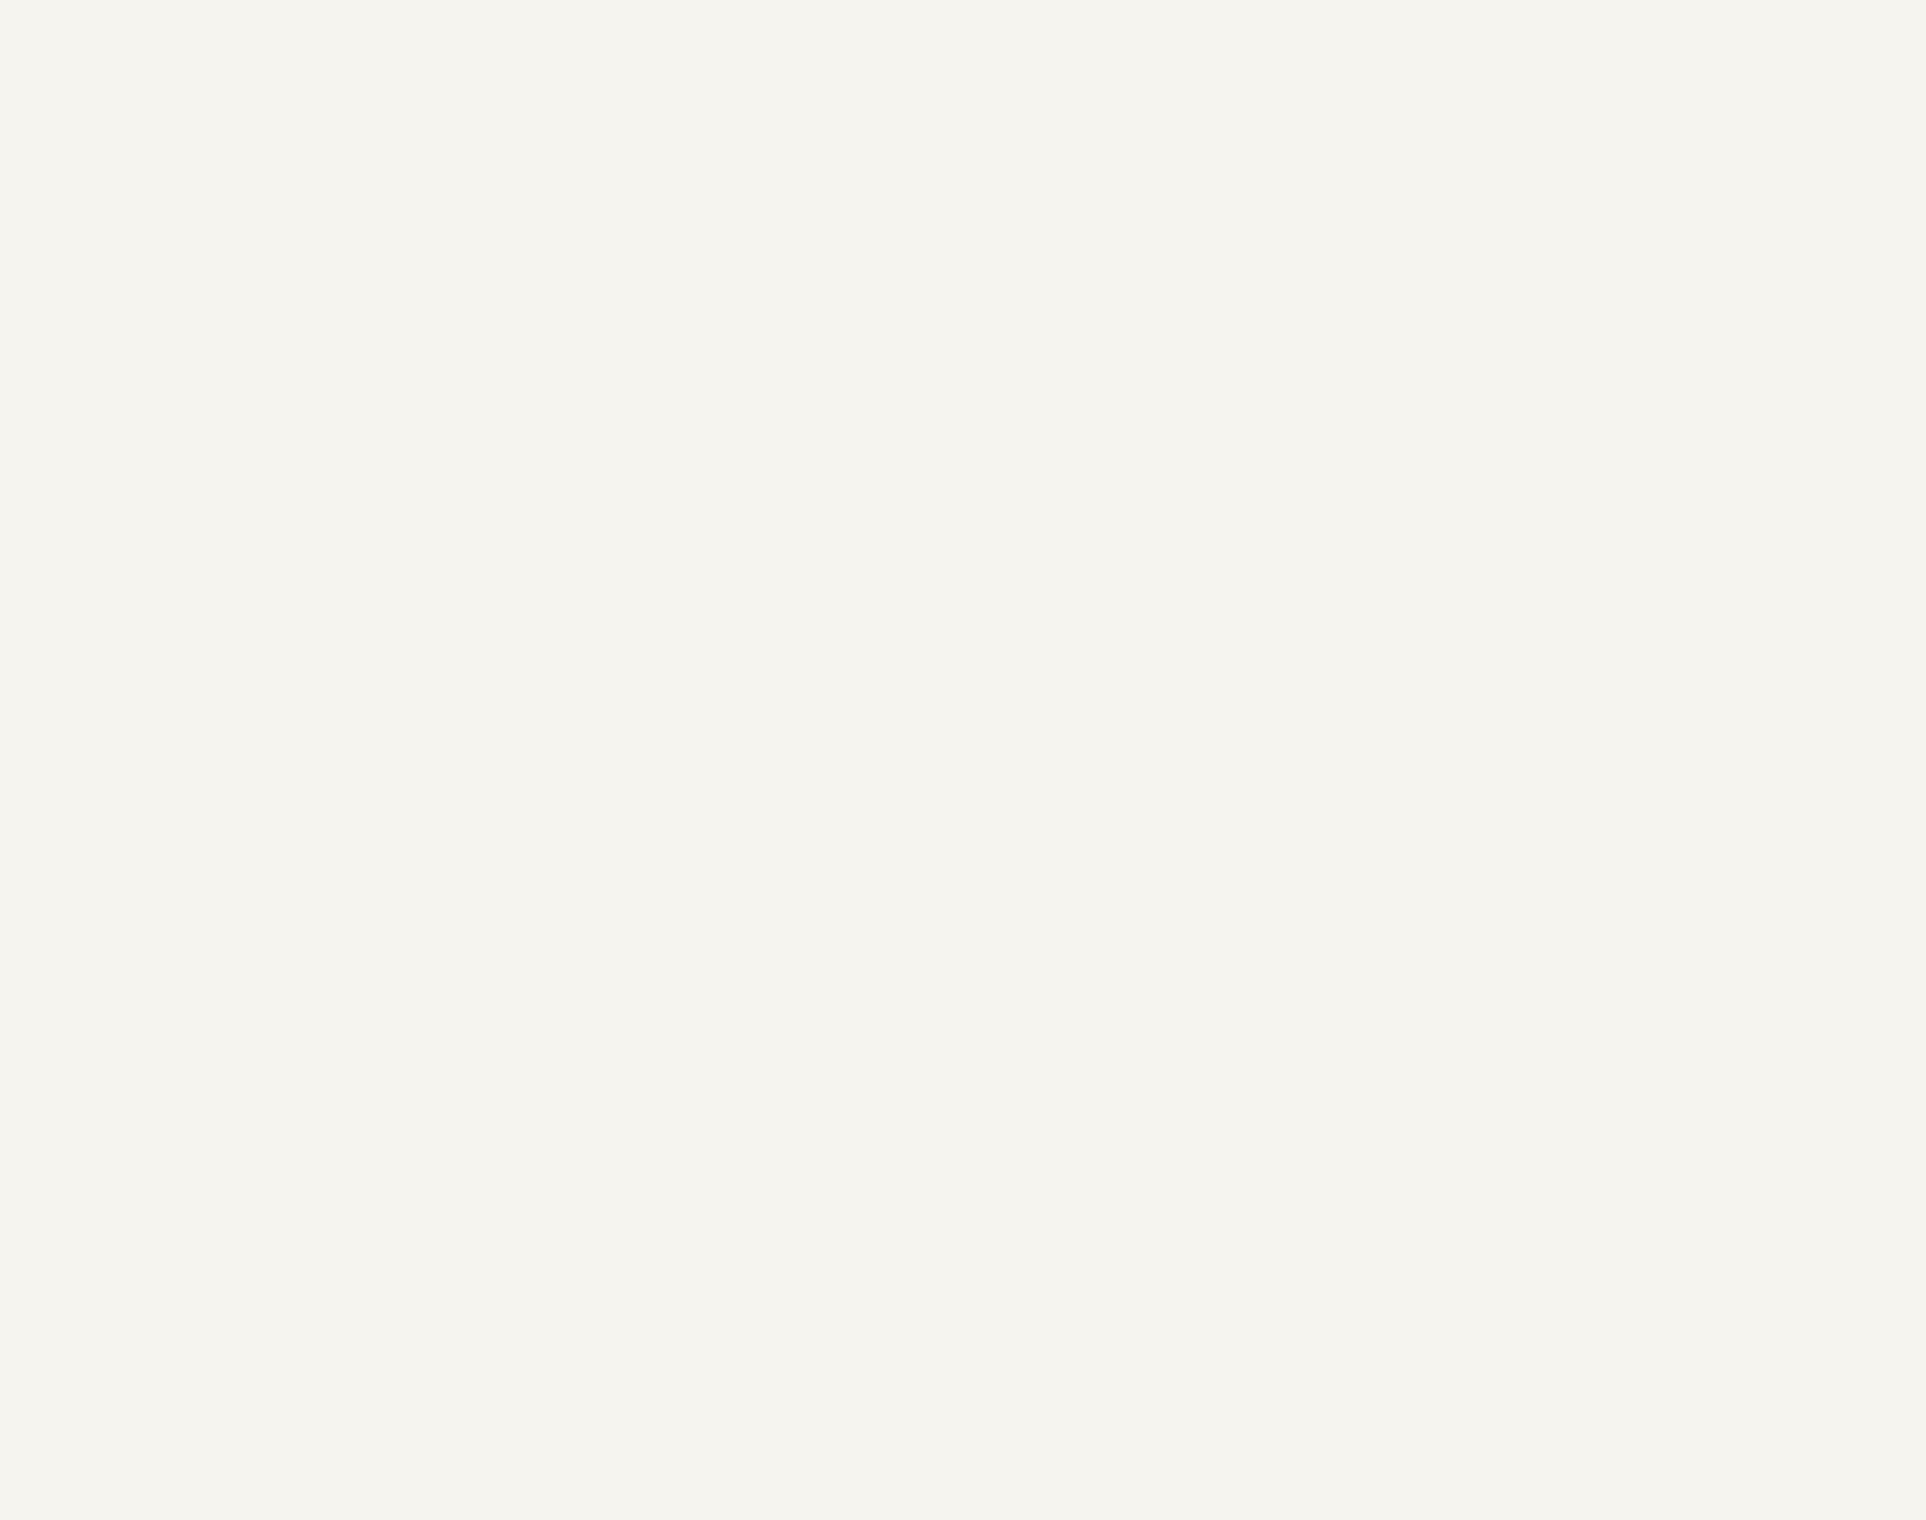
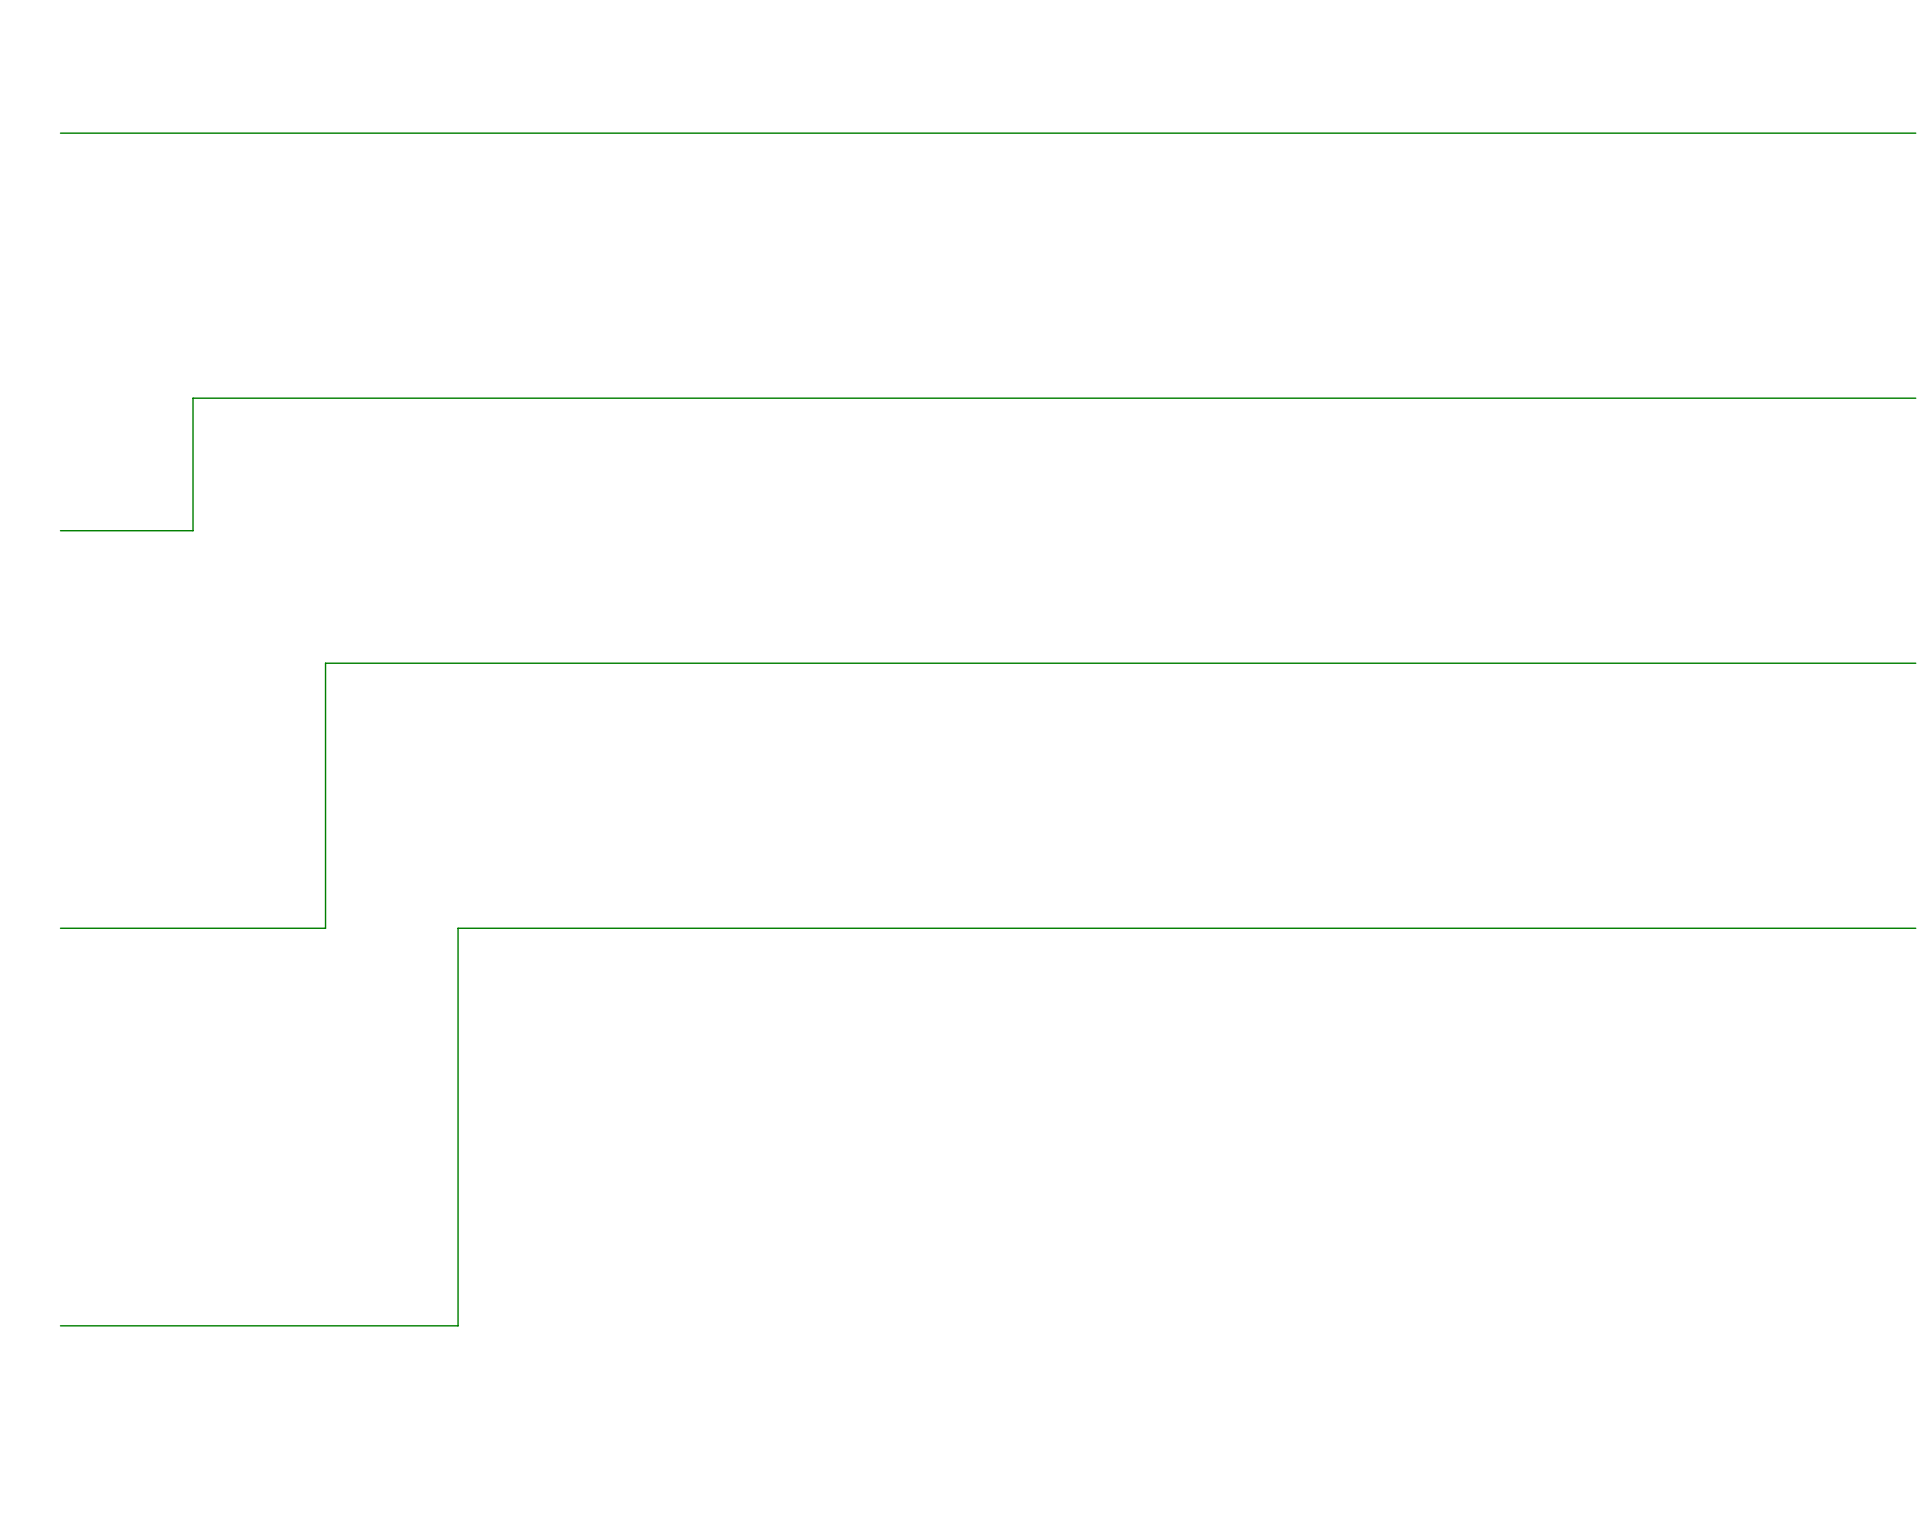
wire: none -> (60, 133) (1915, 133)
wire: none -> (1915, 398) (193, 398) (193, 530) (60, 530)
wire: none -> (1915, 663) (325, 663) (325, 928) (60, 928)
wire: none -> (1915, 928) (458, 928) (458, 1325) (60, 1325)

